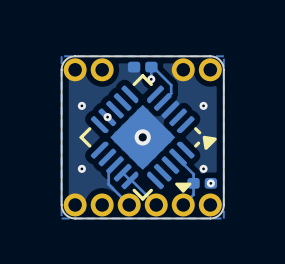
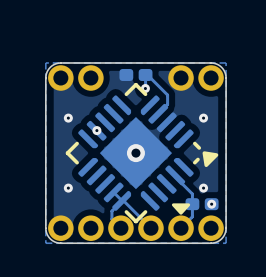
track: (115, 165) (108, 171) (108, 184) (121, 196) -> (122, 200) (111, 211) (111, 219)

